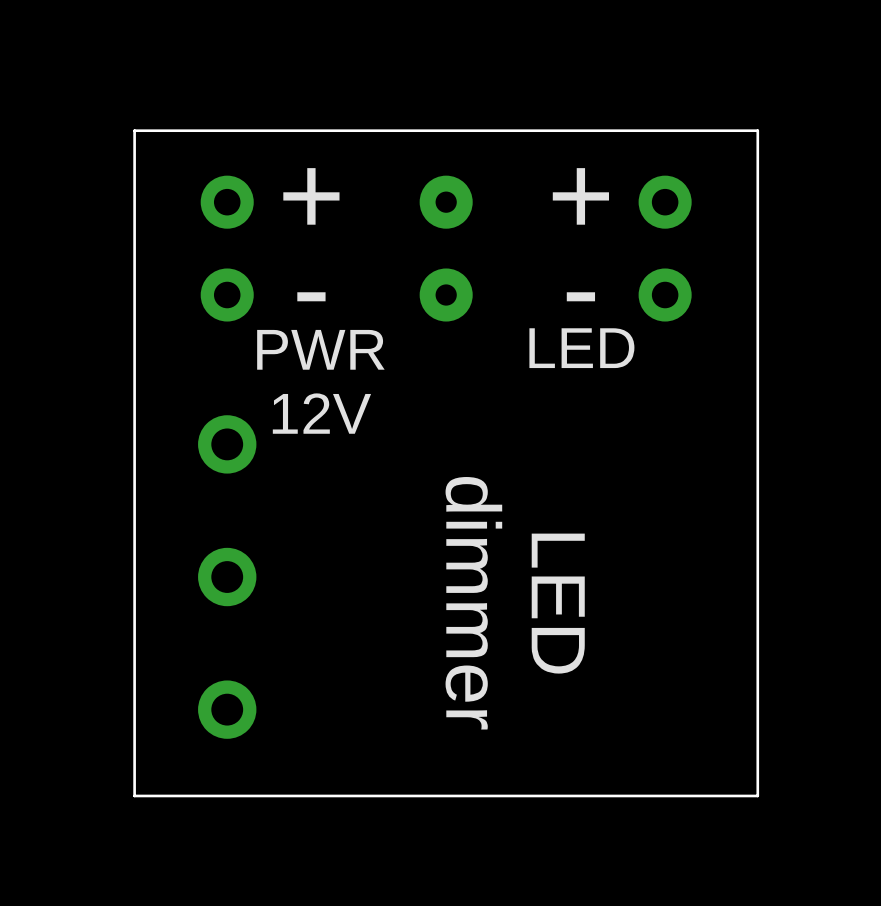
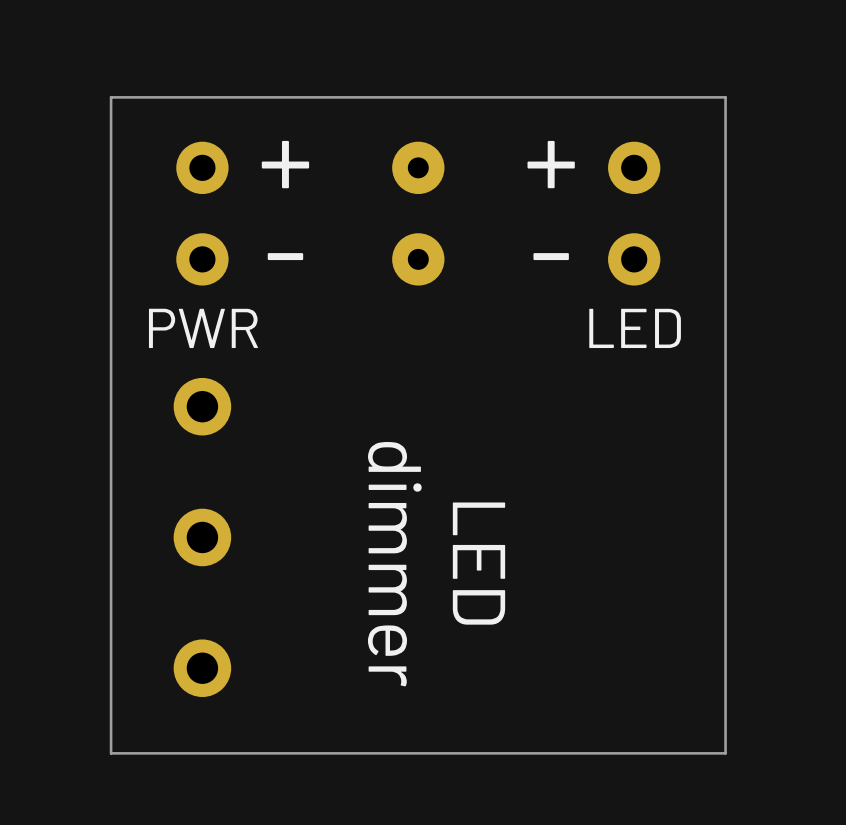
text position: LED (581, 348) -> LED (635, 328)
text position: PWR (320, 349) -> PWR (203, 328)
text: 12V (321, 413) -> none
text position: dimmer (473, 603) -> dimmer (394, 564)
text position: LED (558, 603) -> LED (478, 563)

